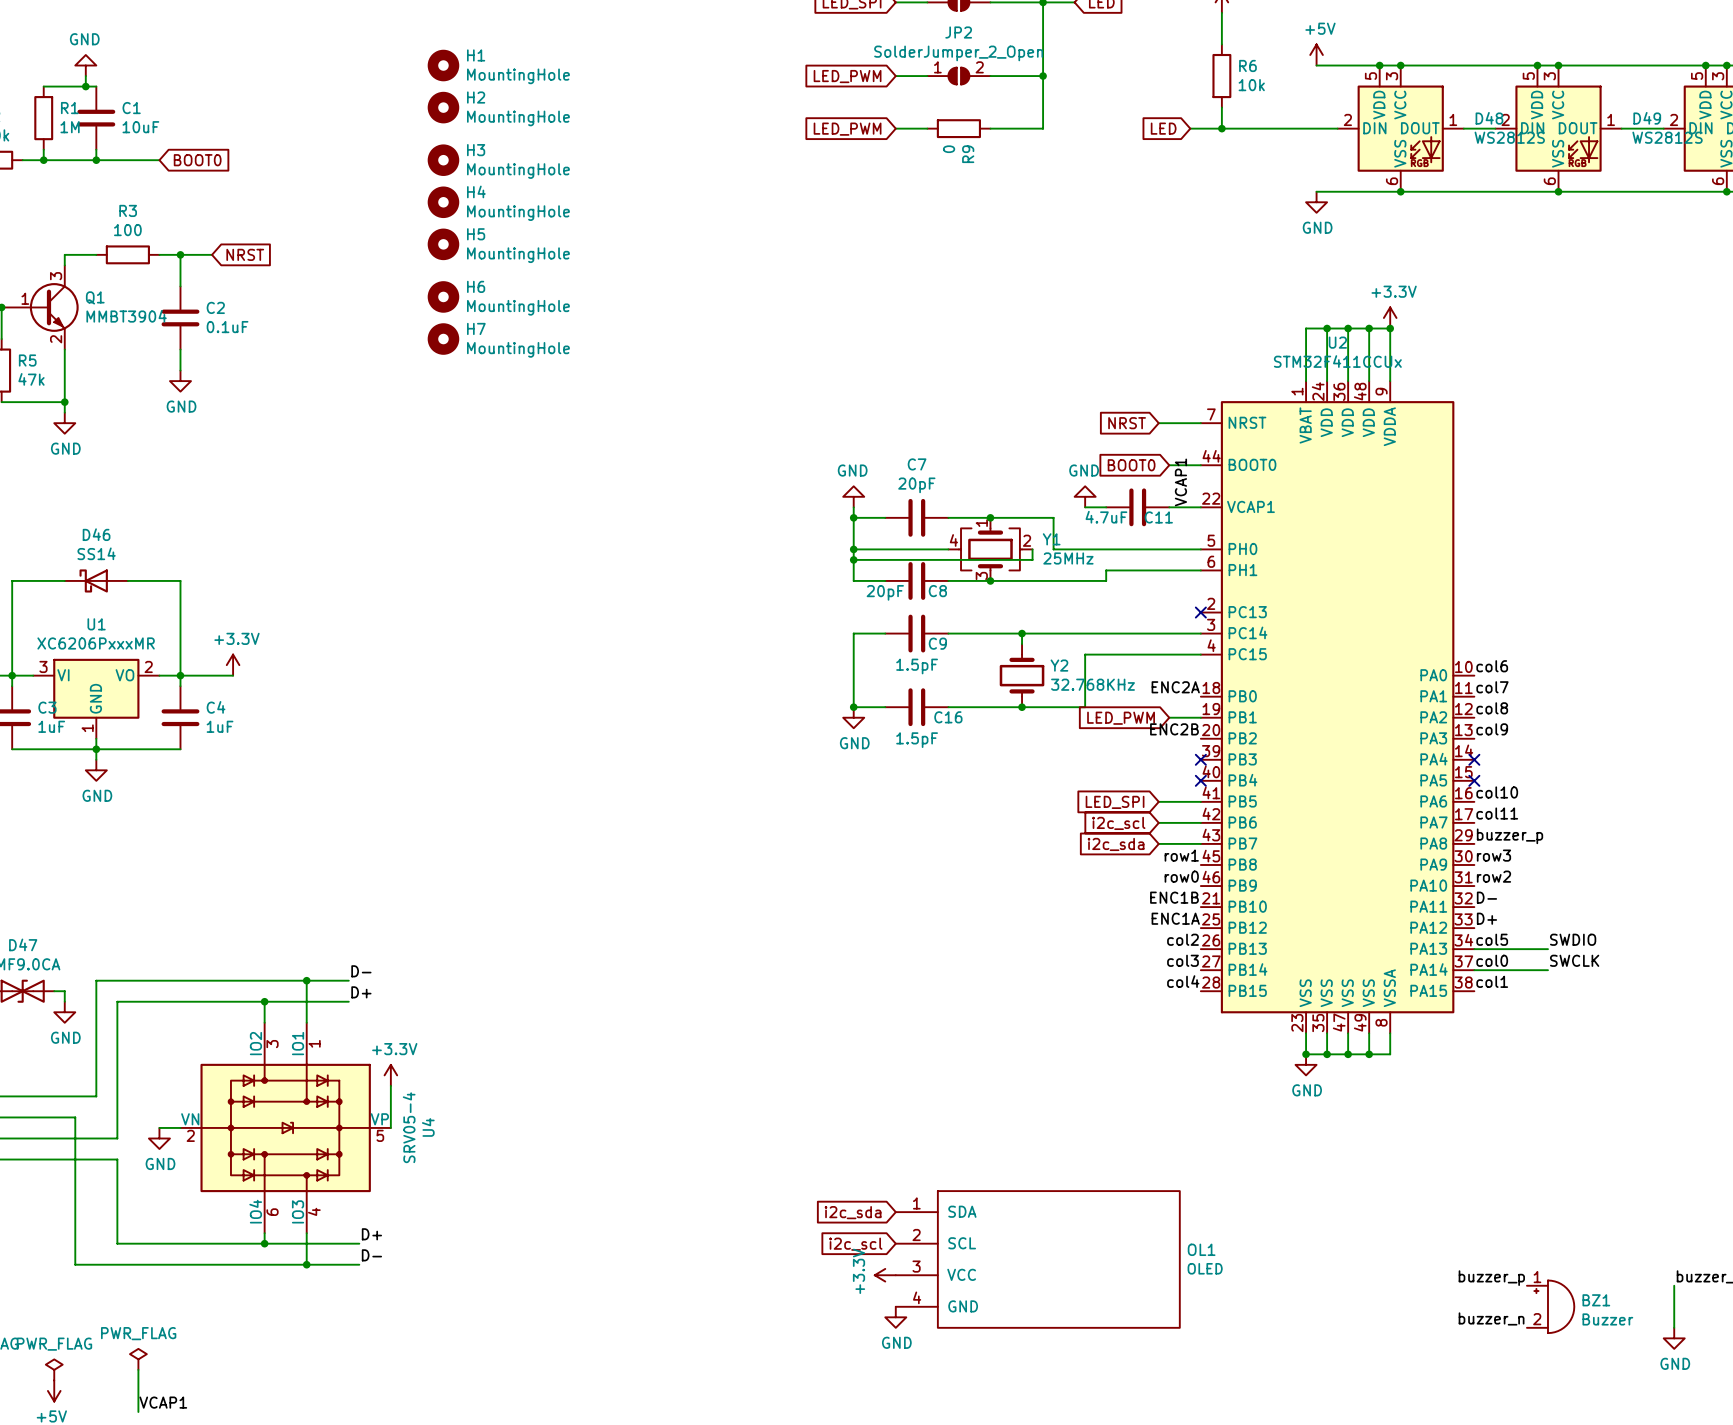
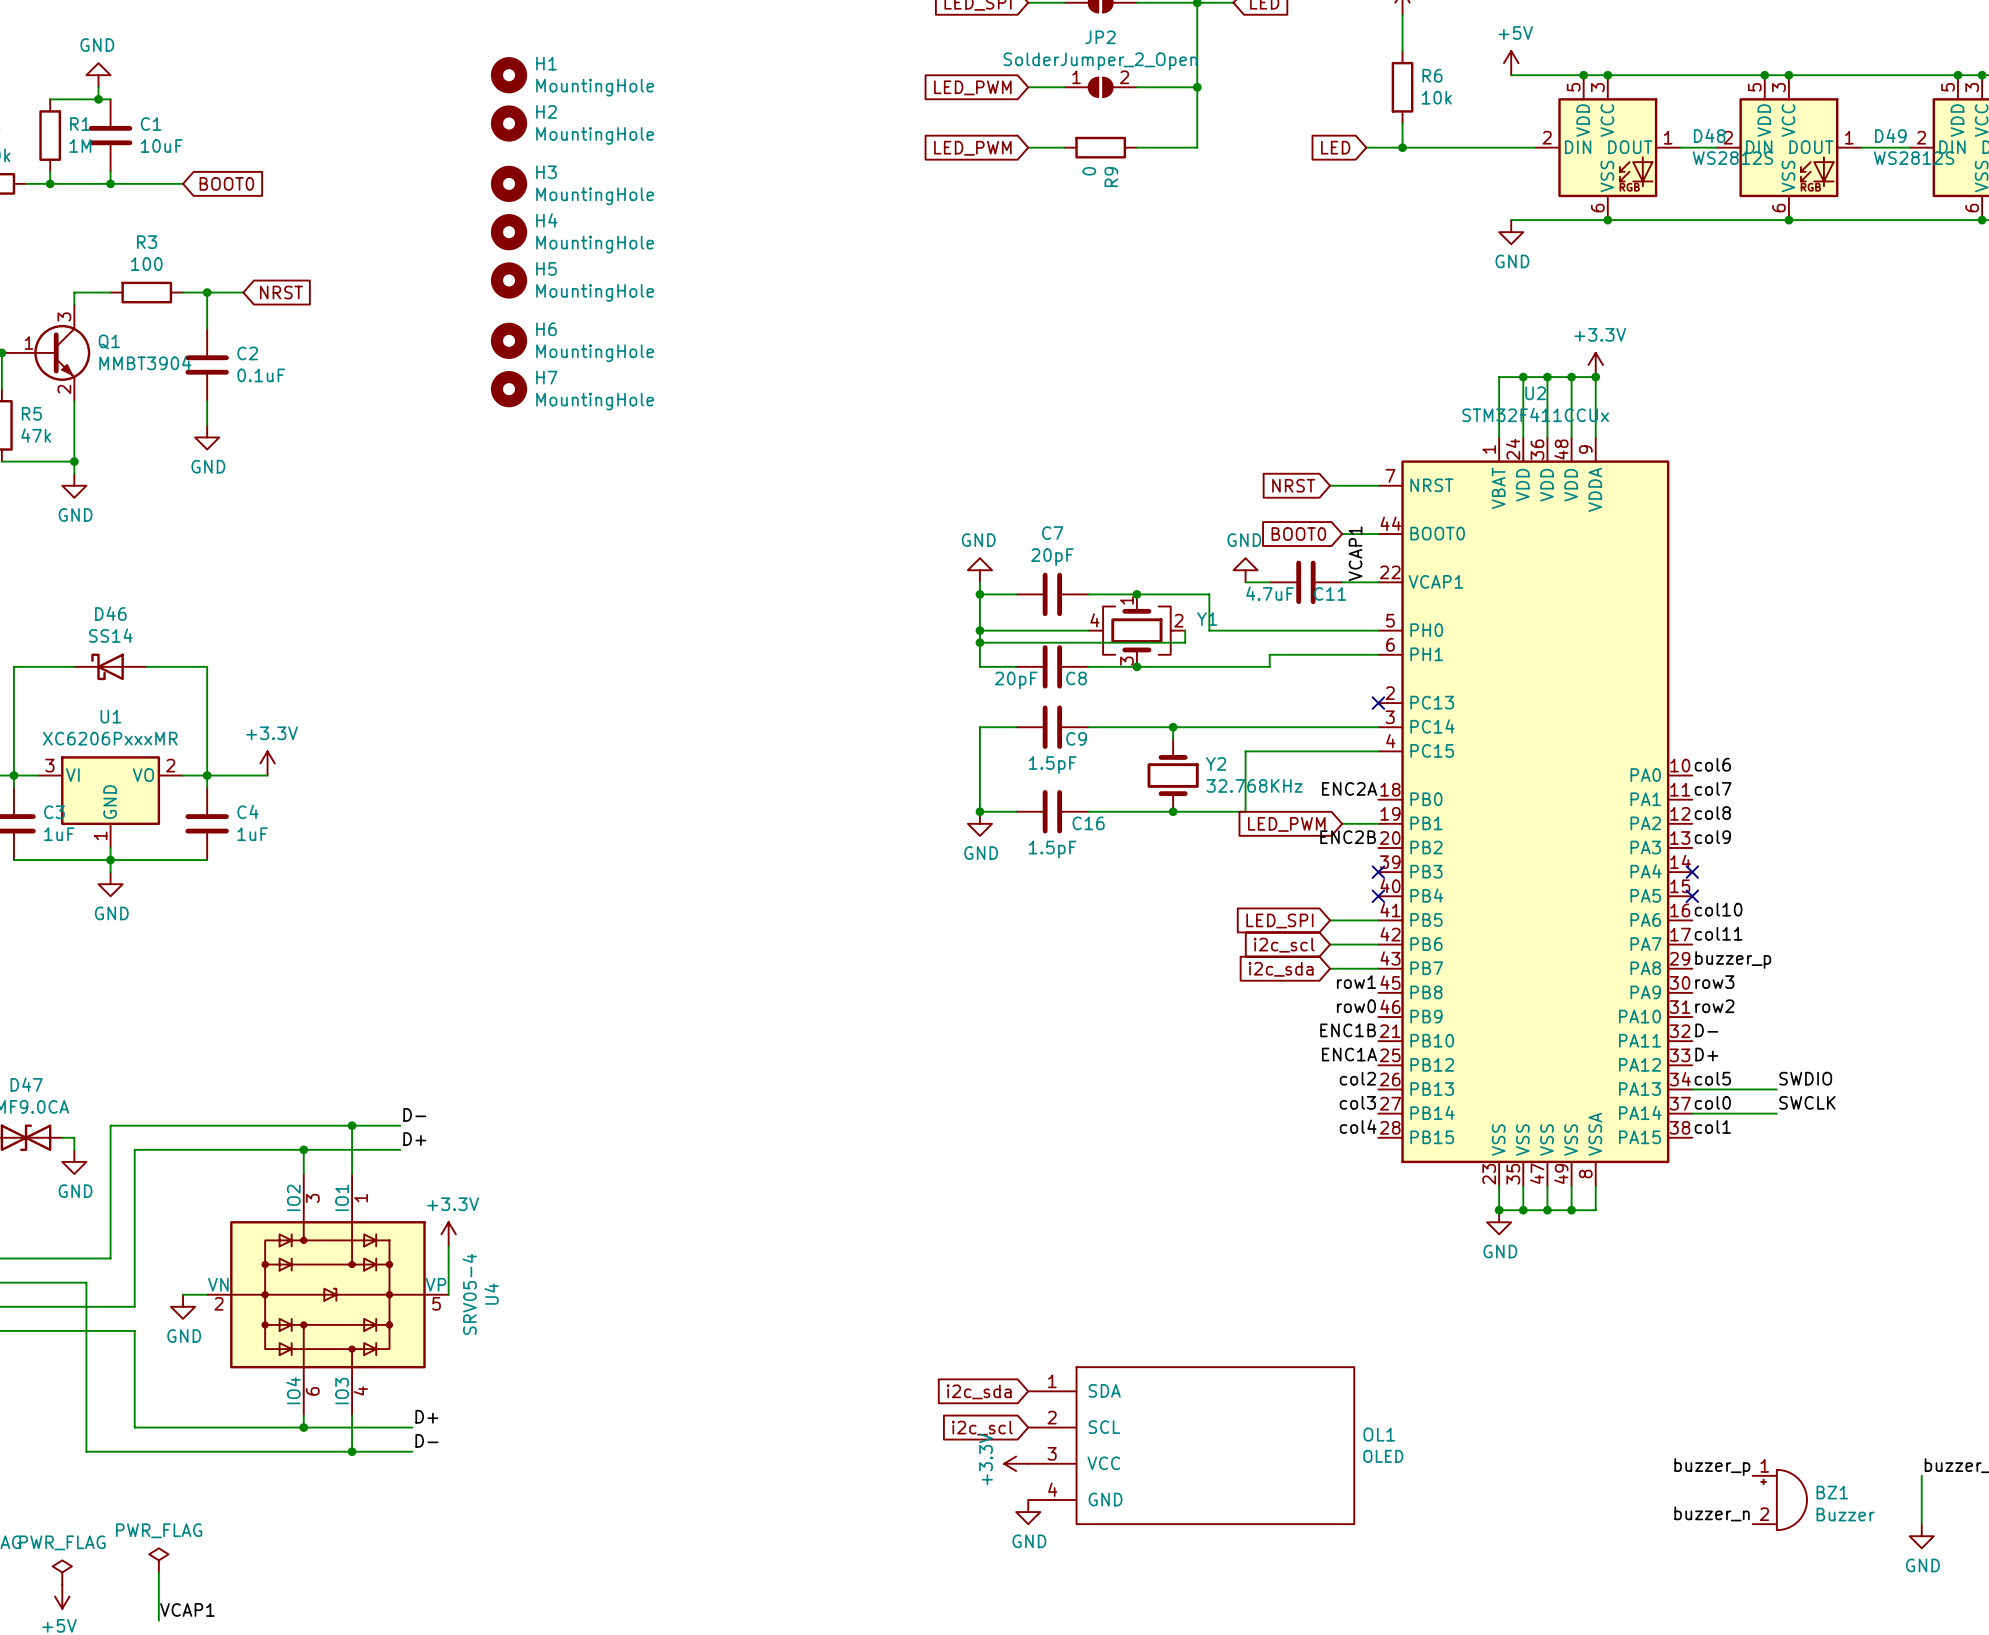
Y1 value: 25MHz (1068, 558) -> none

